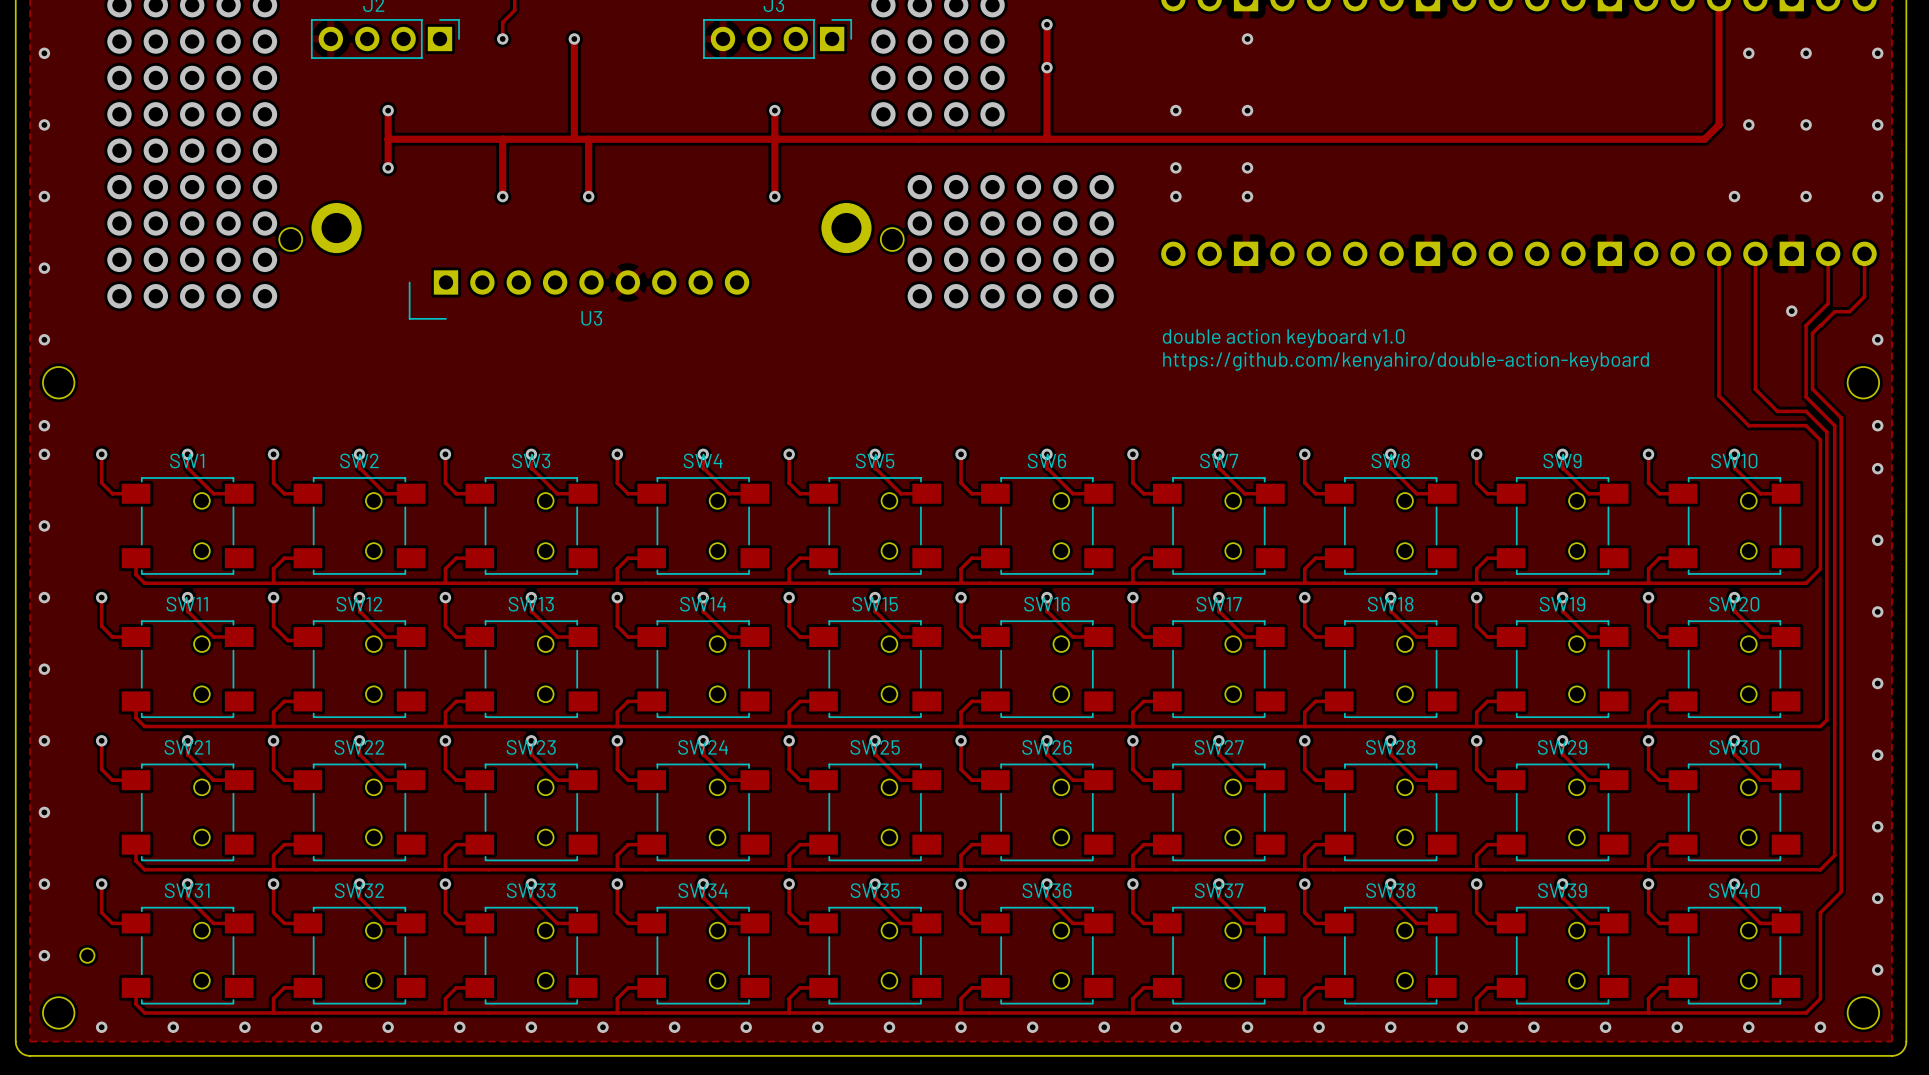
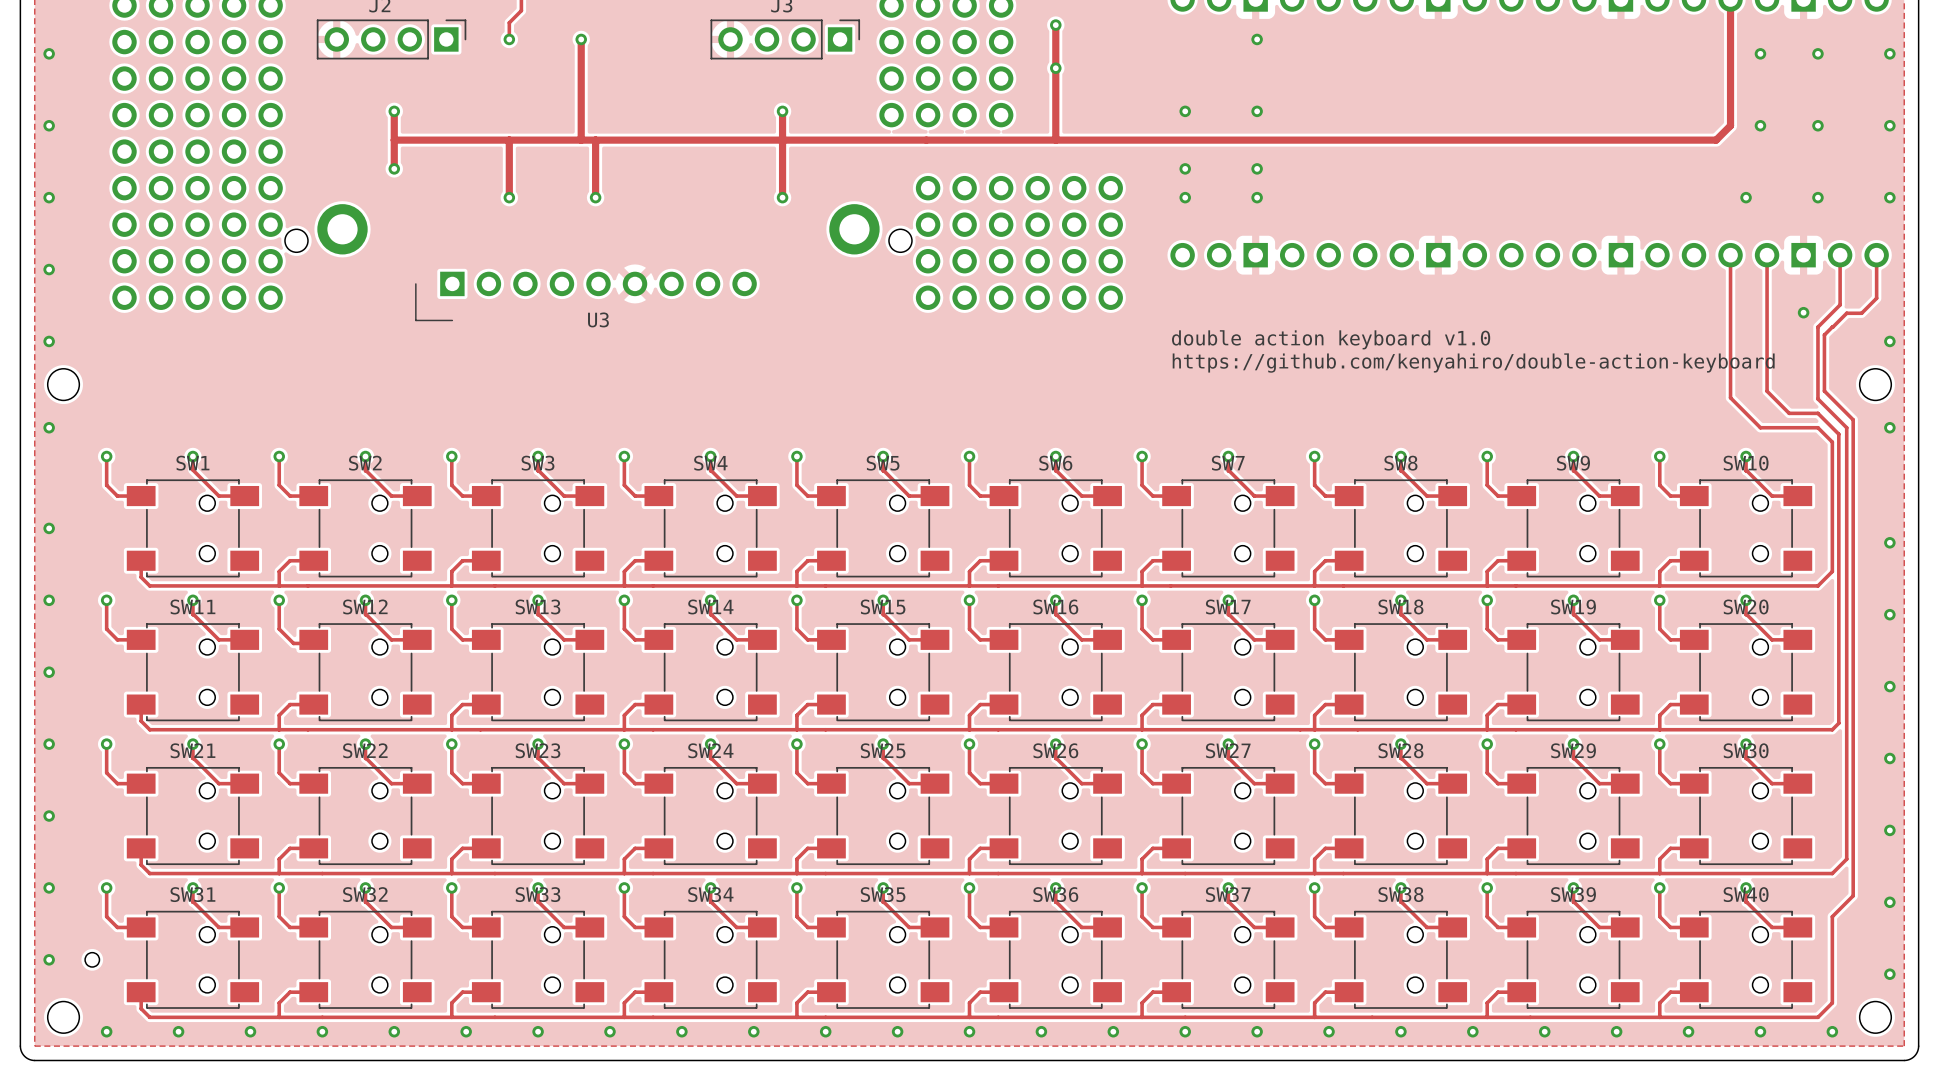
via: (44, 454) -> none
via: (1877, 468) -> none

